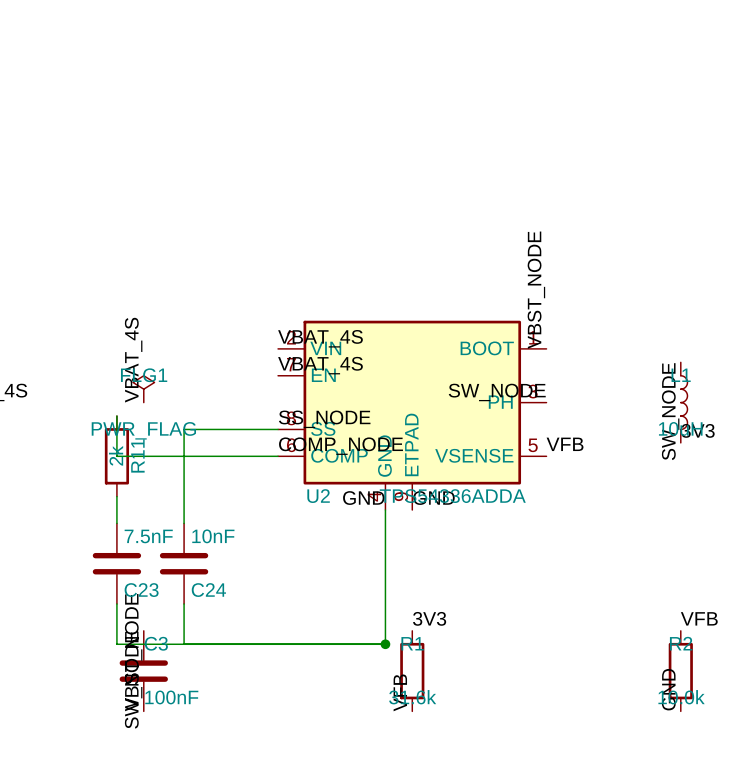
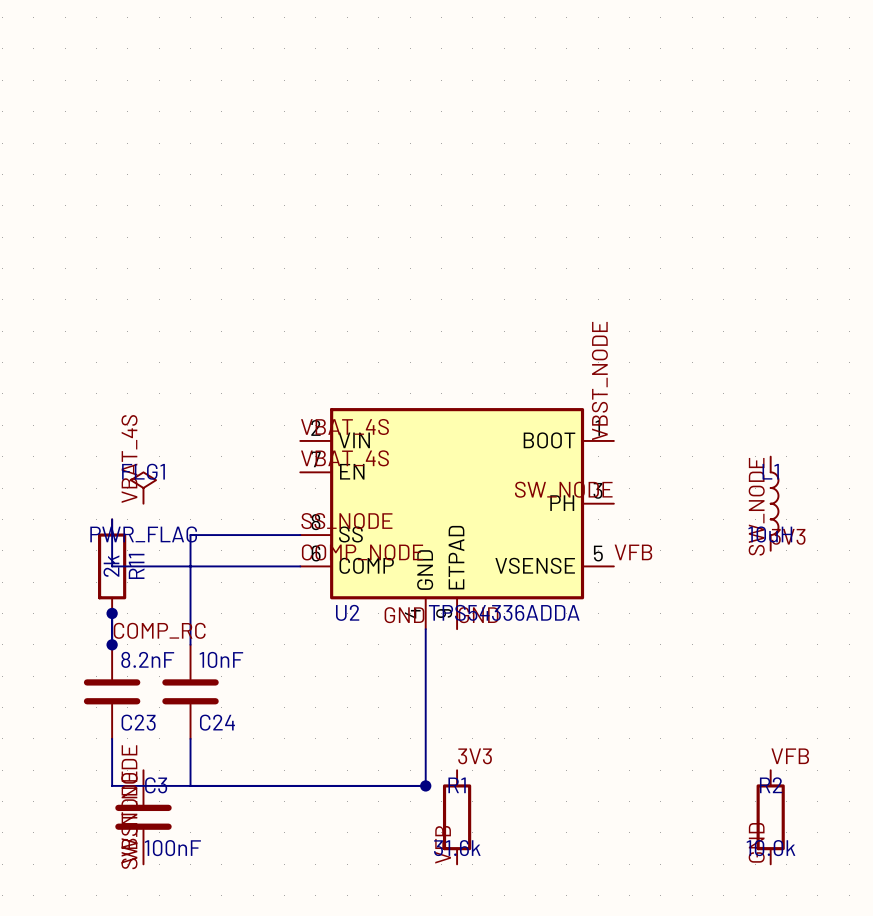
junction: none -> (112, 613)
label: none -> COMP_RC (159, 630)
junction: none -> (112, 644)
C23 value: 7.5nF (148, 536) -> 8.2nF (147, 659)

